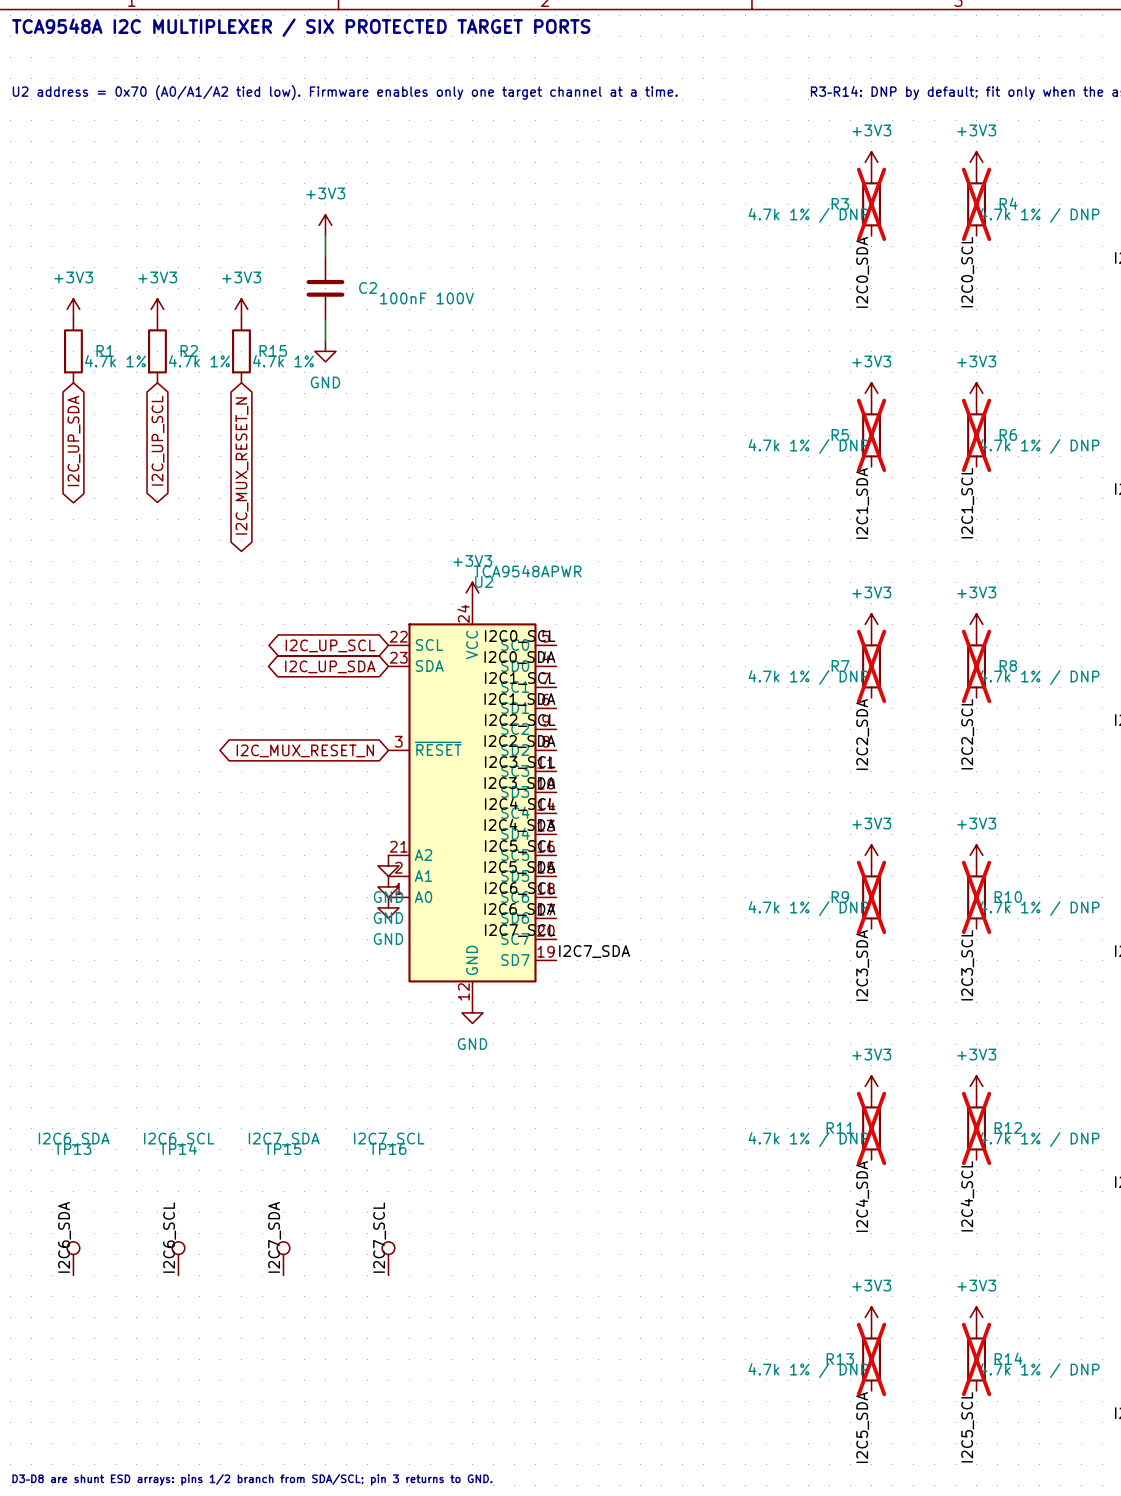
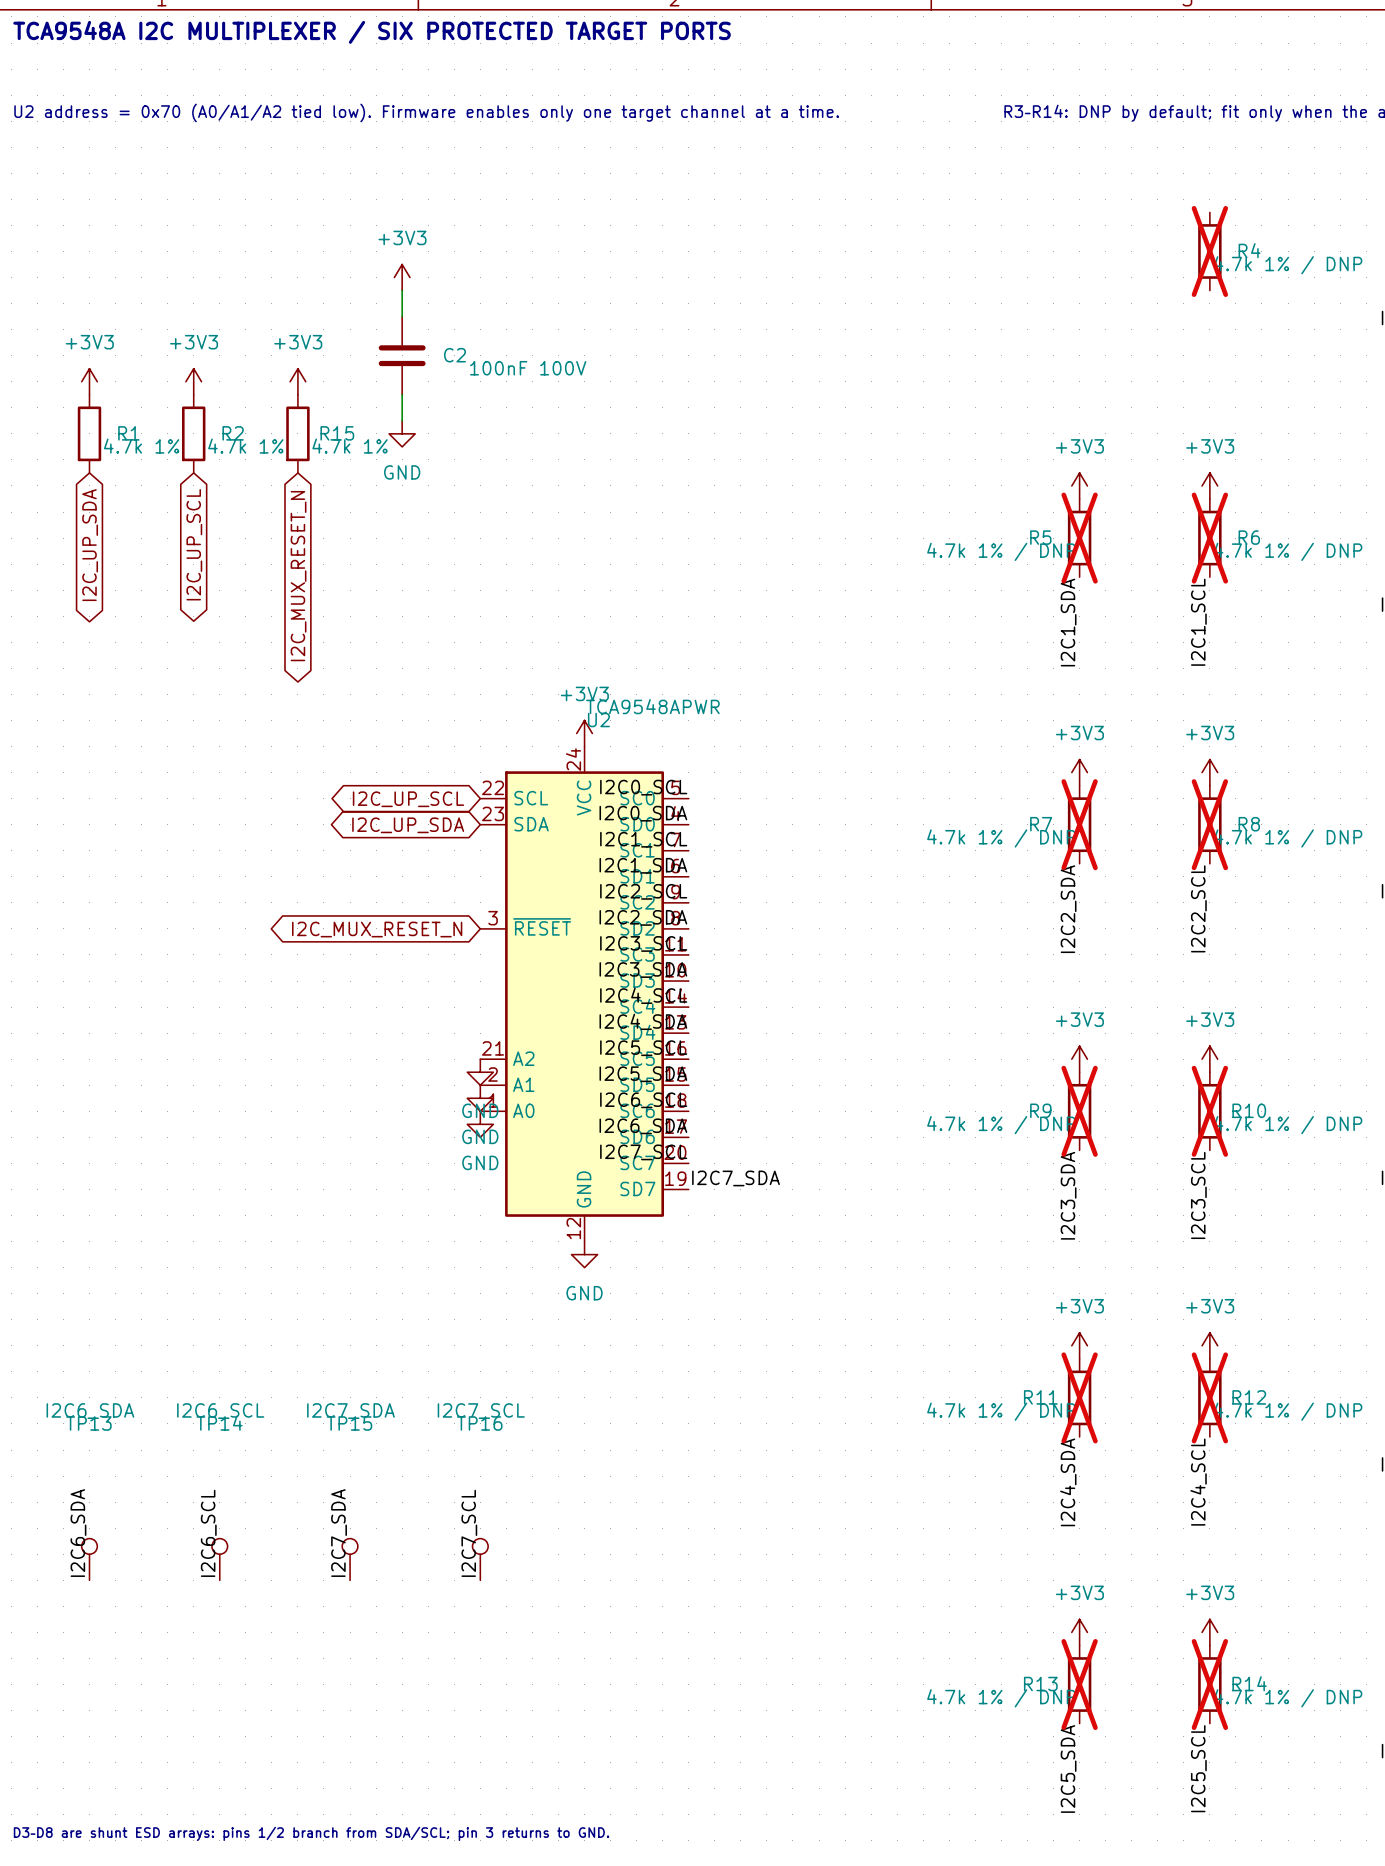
power symbol: +3V3 (871, 162) -> none
power symbol: +3V3 (976, 162) -> none
R3: 4.7k 1% / DNP (871, 204) -> none
label: I2C0_SDA (862, 272) -> none
label: I2C0_SCL (967, 272) -> none

